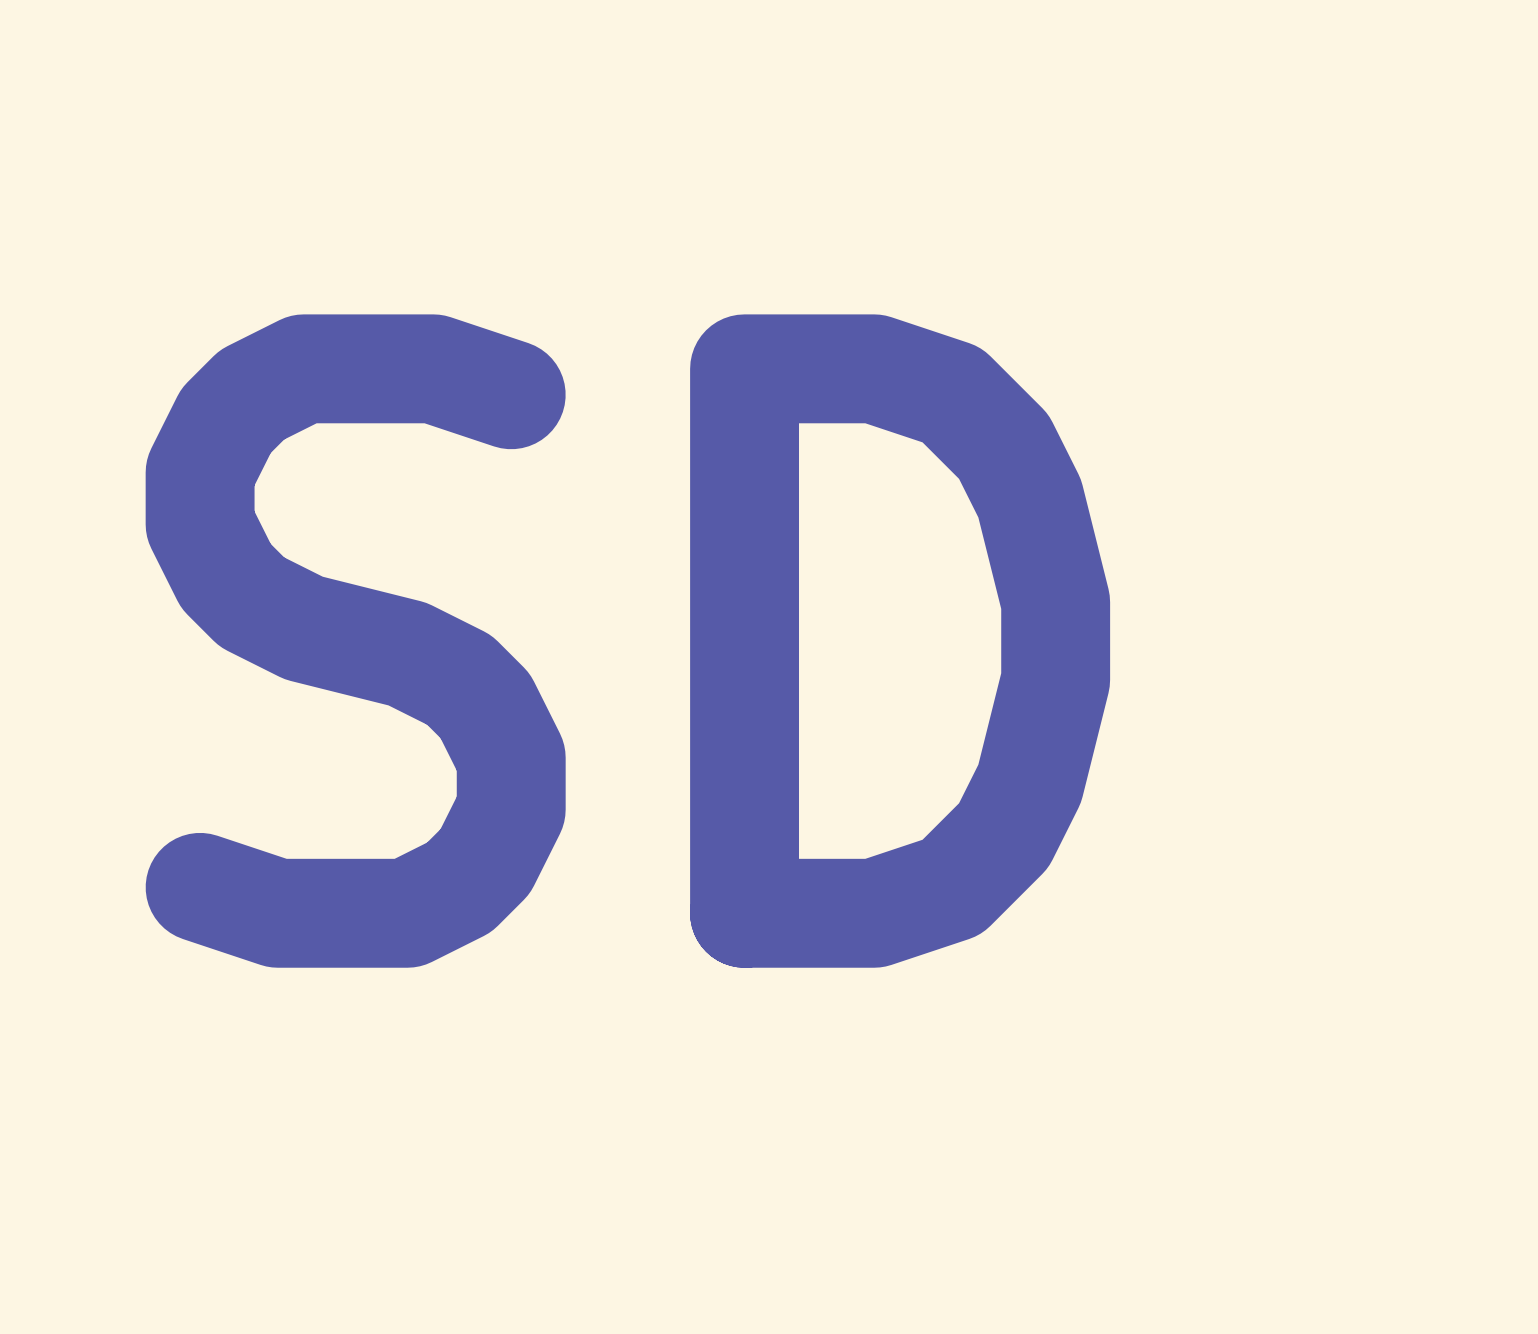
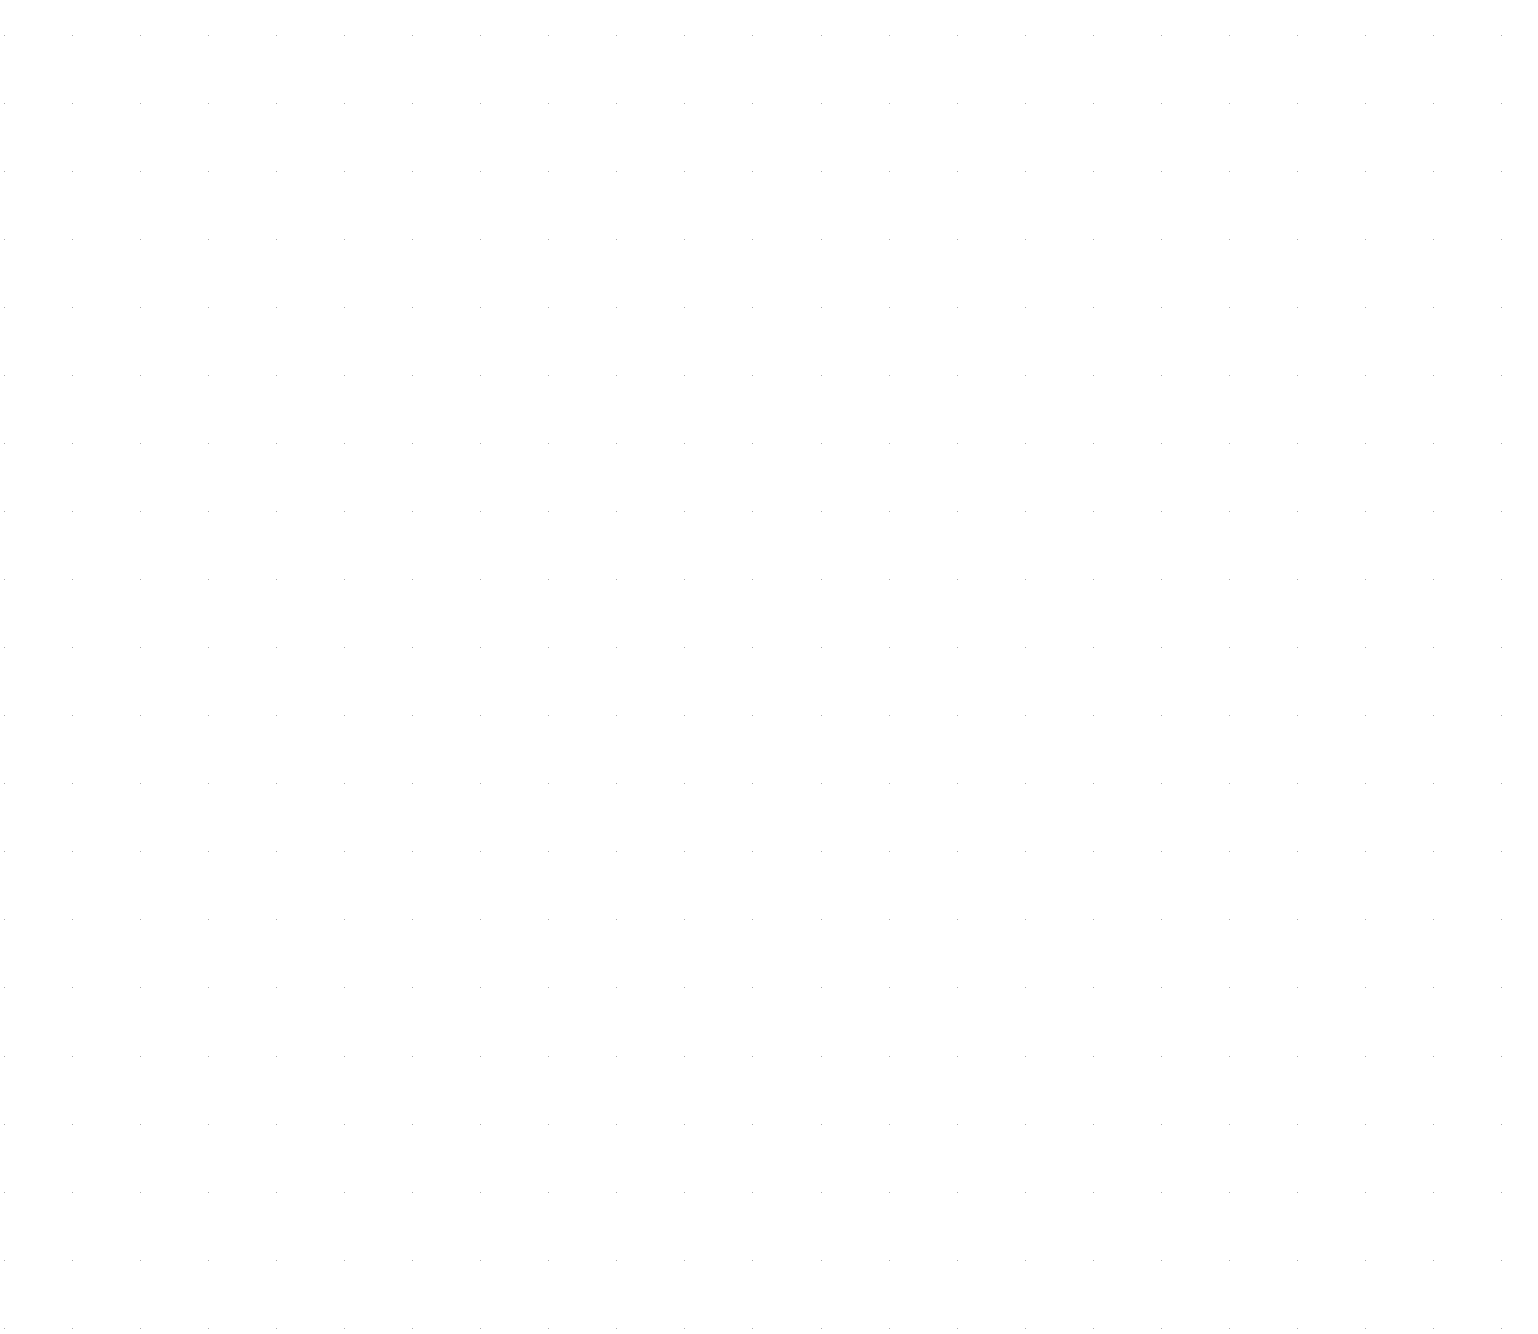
text: SD (627, 641) -> none

